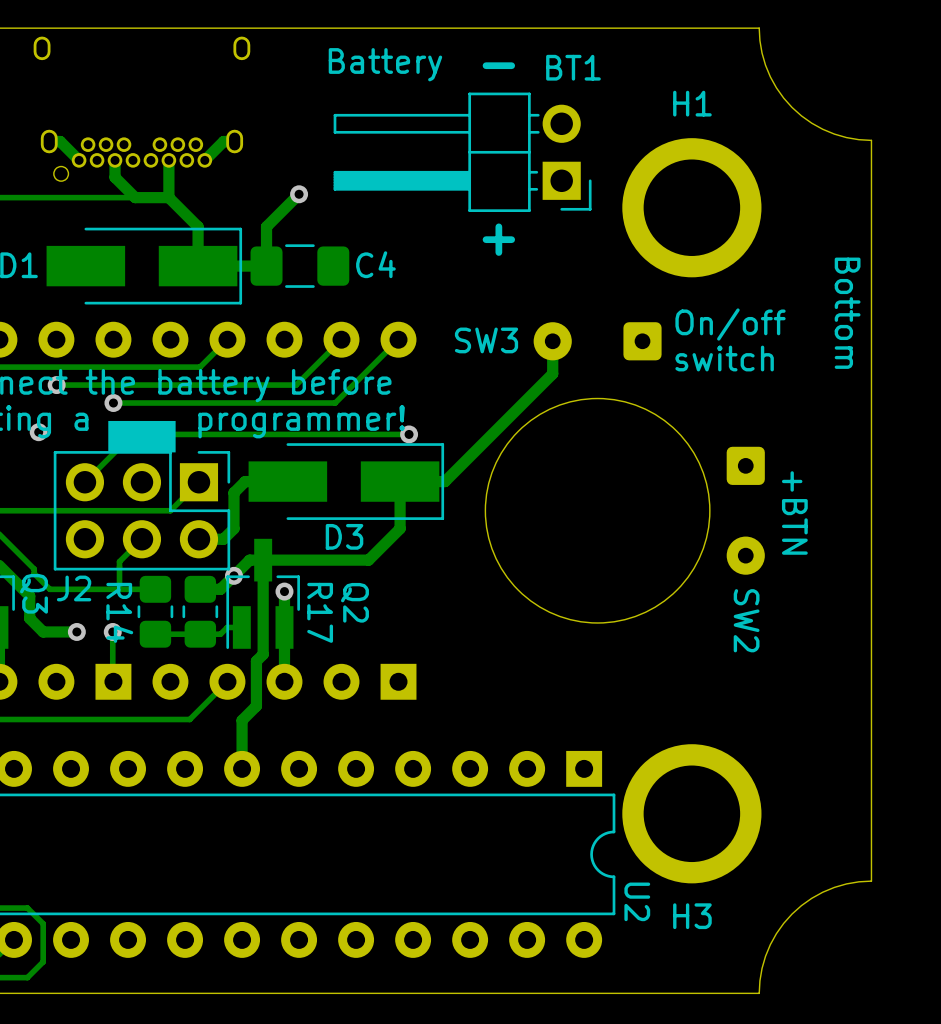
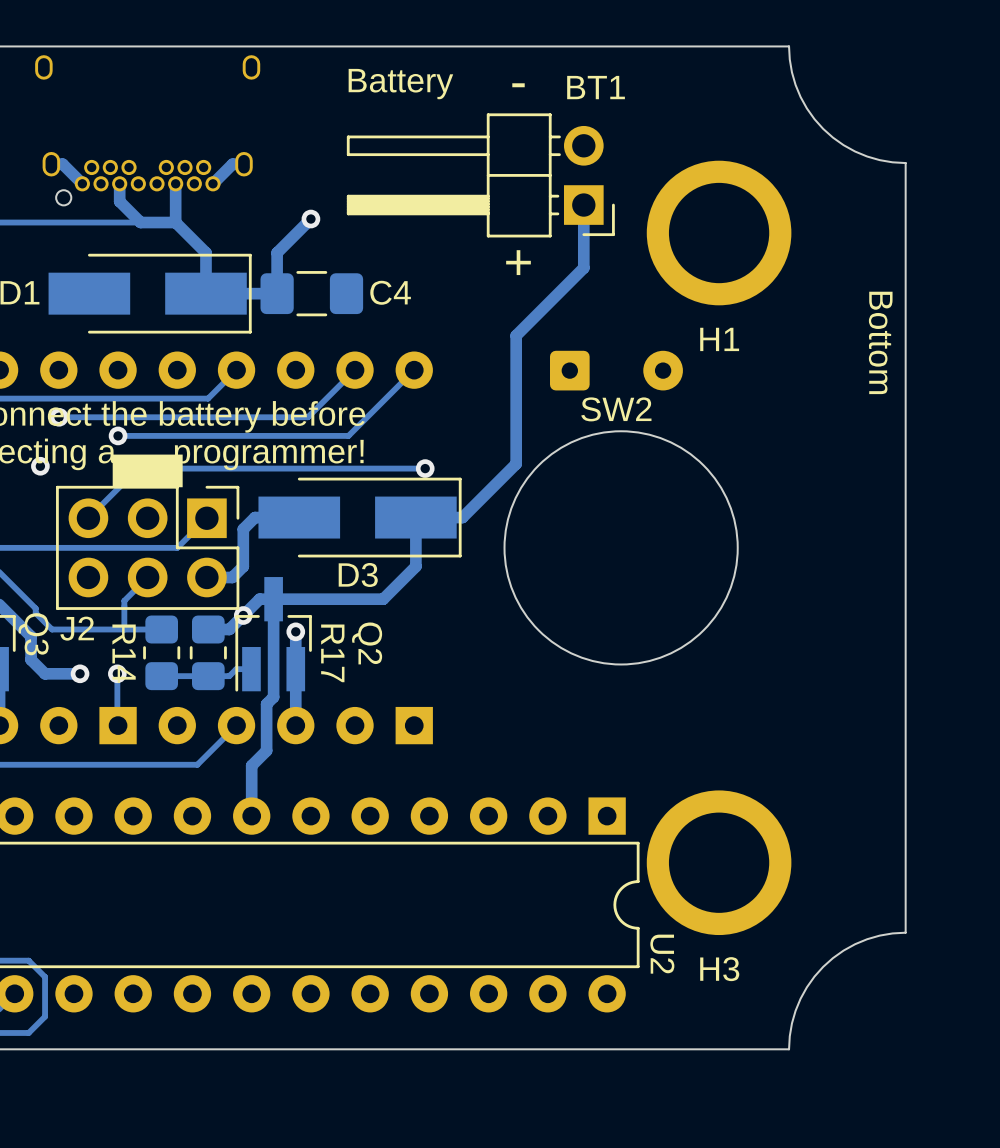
H1 name position: H1 (692, 103) -> H1 (719, 339)
text: On/off (730, 324) -> none
track: (552, 341) (552, 373) (496, 429) -> (583, 205) (583, 268) (516, 335) (516, 463)
SW3: (597, 341) -> none
text: switch (724, 358) -> none
SW2 rotation: 0° (745, 510) -> 90° counterclockwise (616, 370)
SW2 position: (745, 510) -> (616, 370)
text: +BTN (794, 513) -> none
SW2 name position: SW2 (746, 620) -> SW2 (616, 409)

